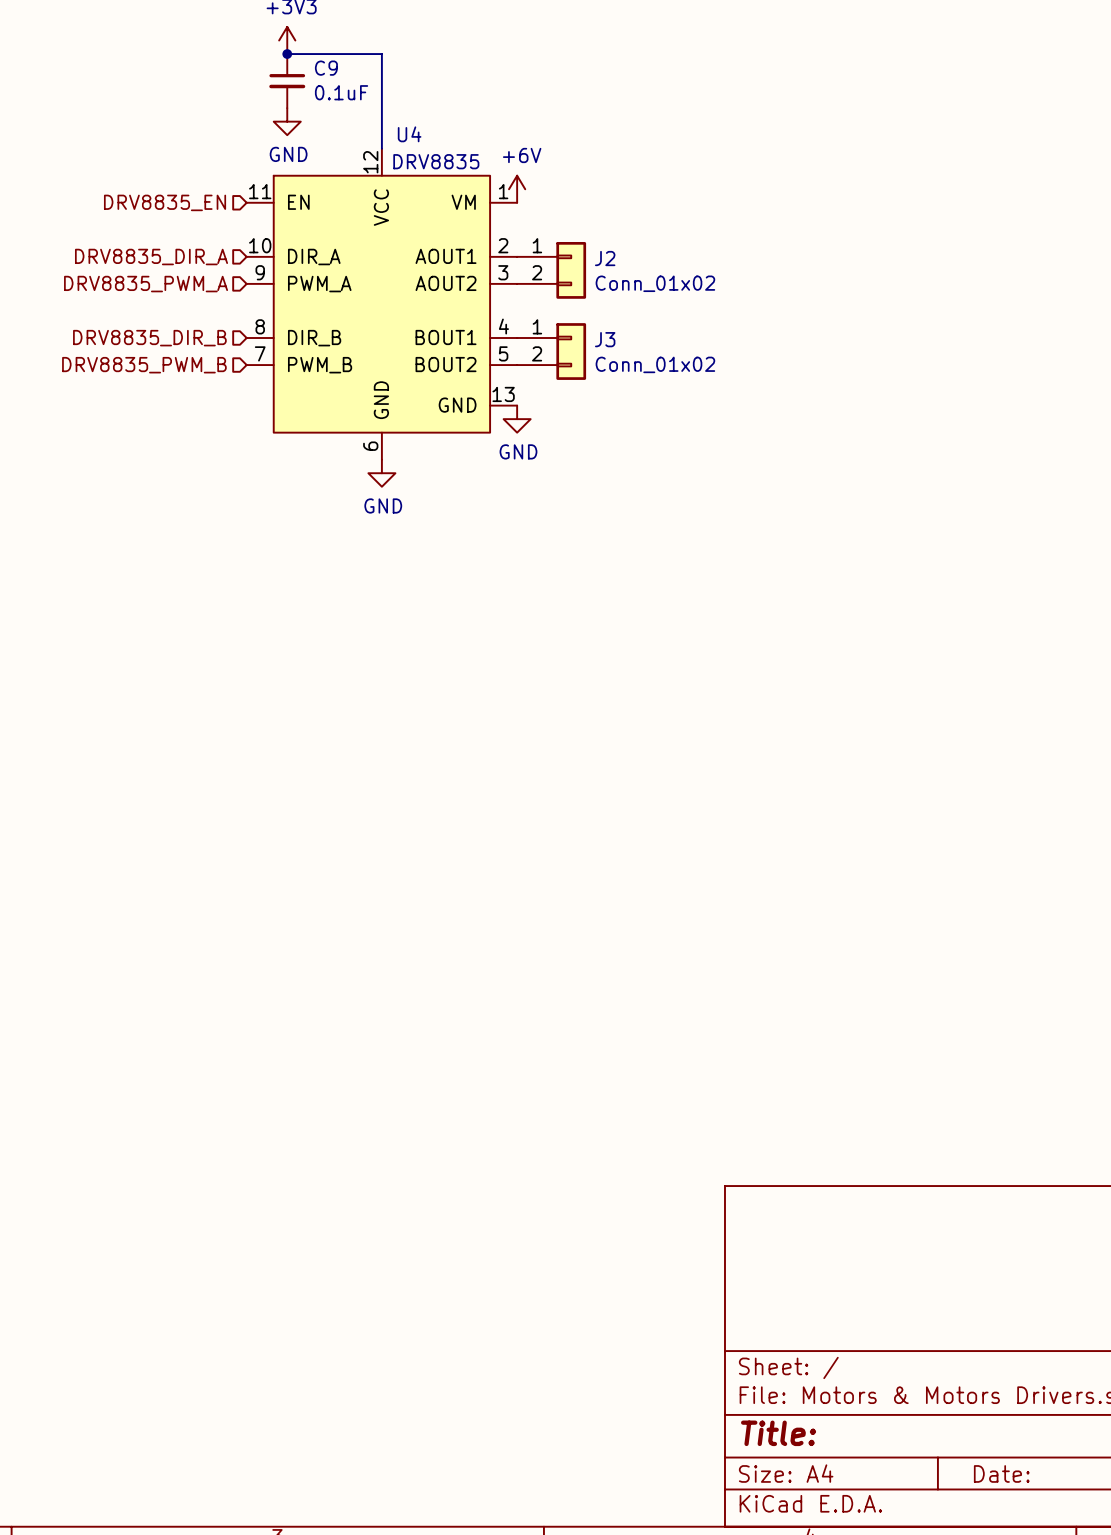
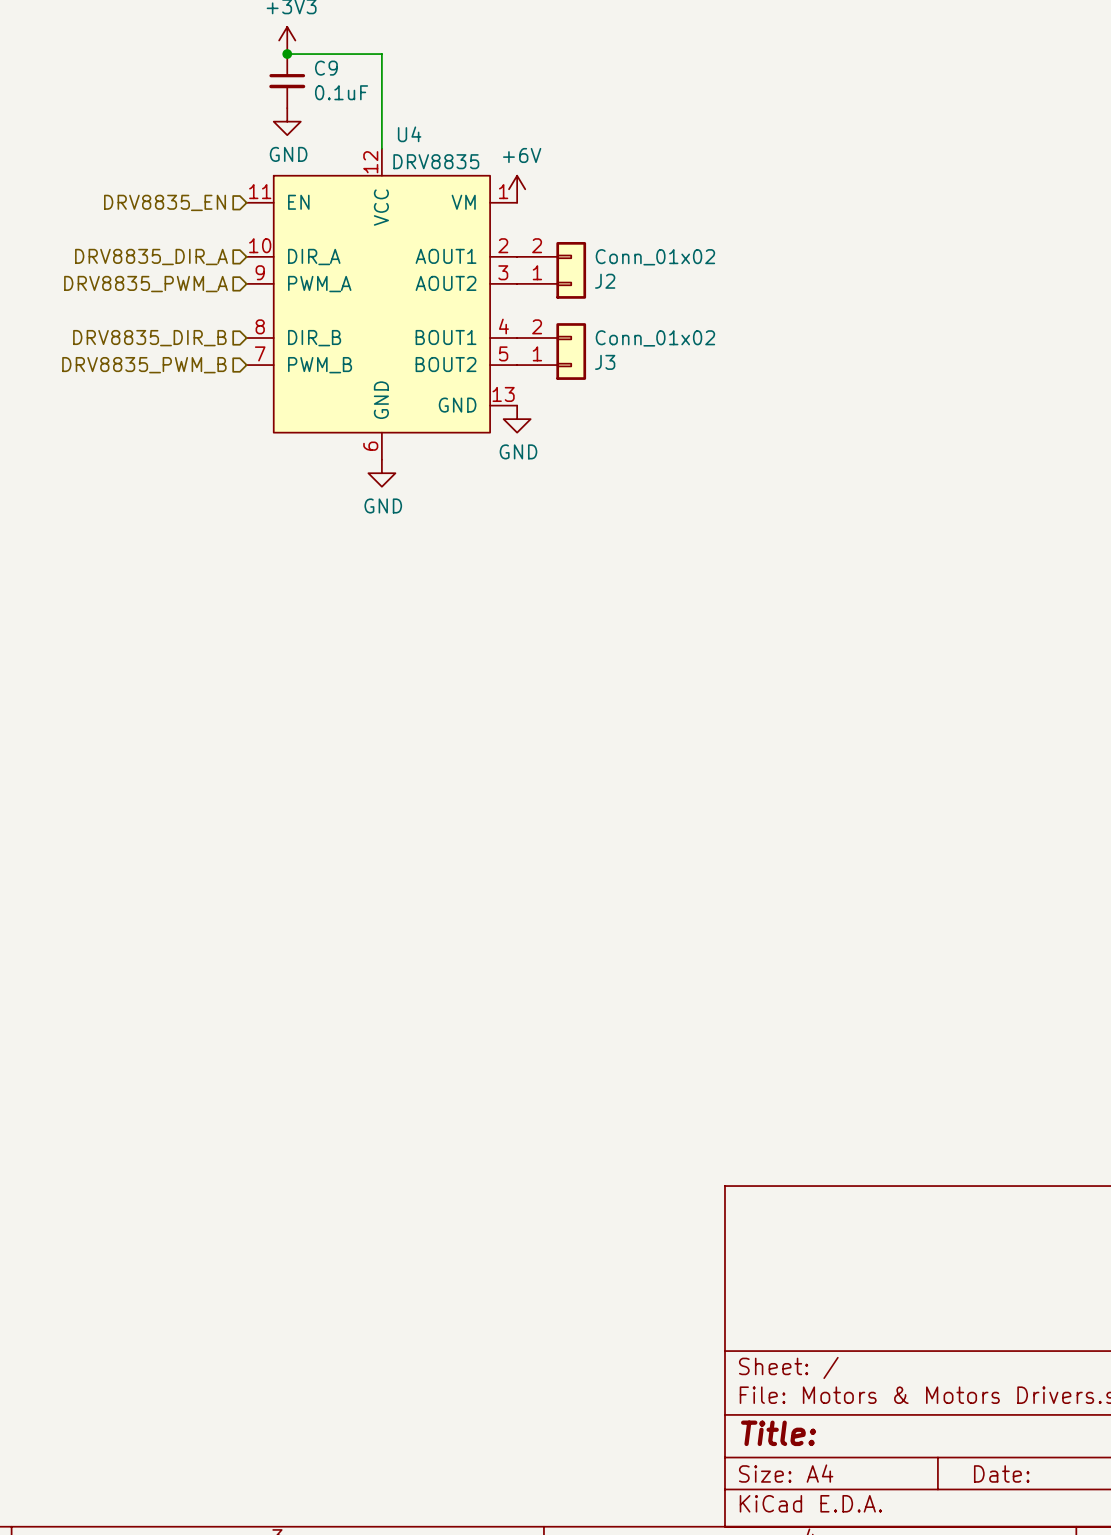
J2 flip: as is (571, 270) -> up-down (571, 270)
J3 flip: as is (571, 351) -> up-down (571, 351)

